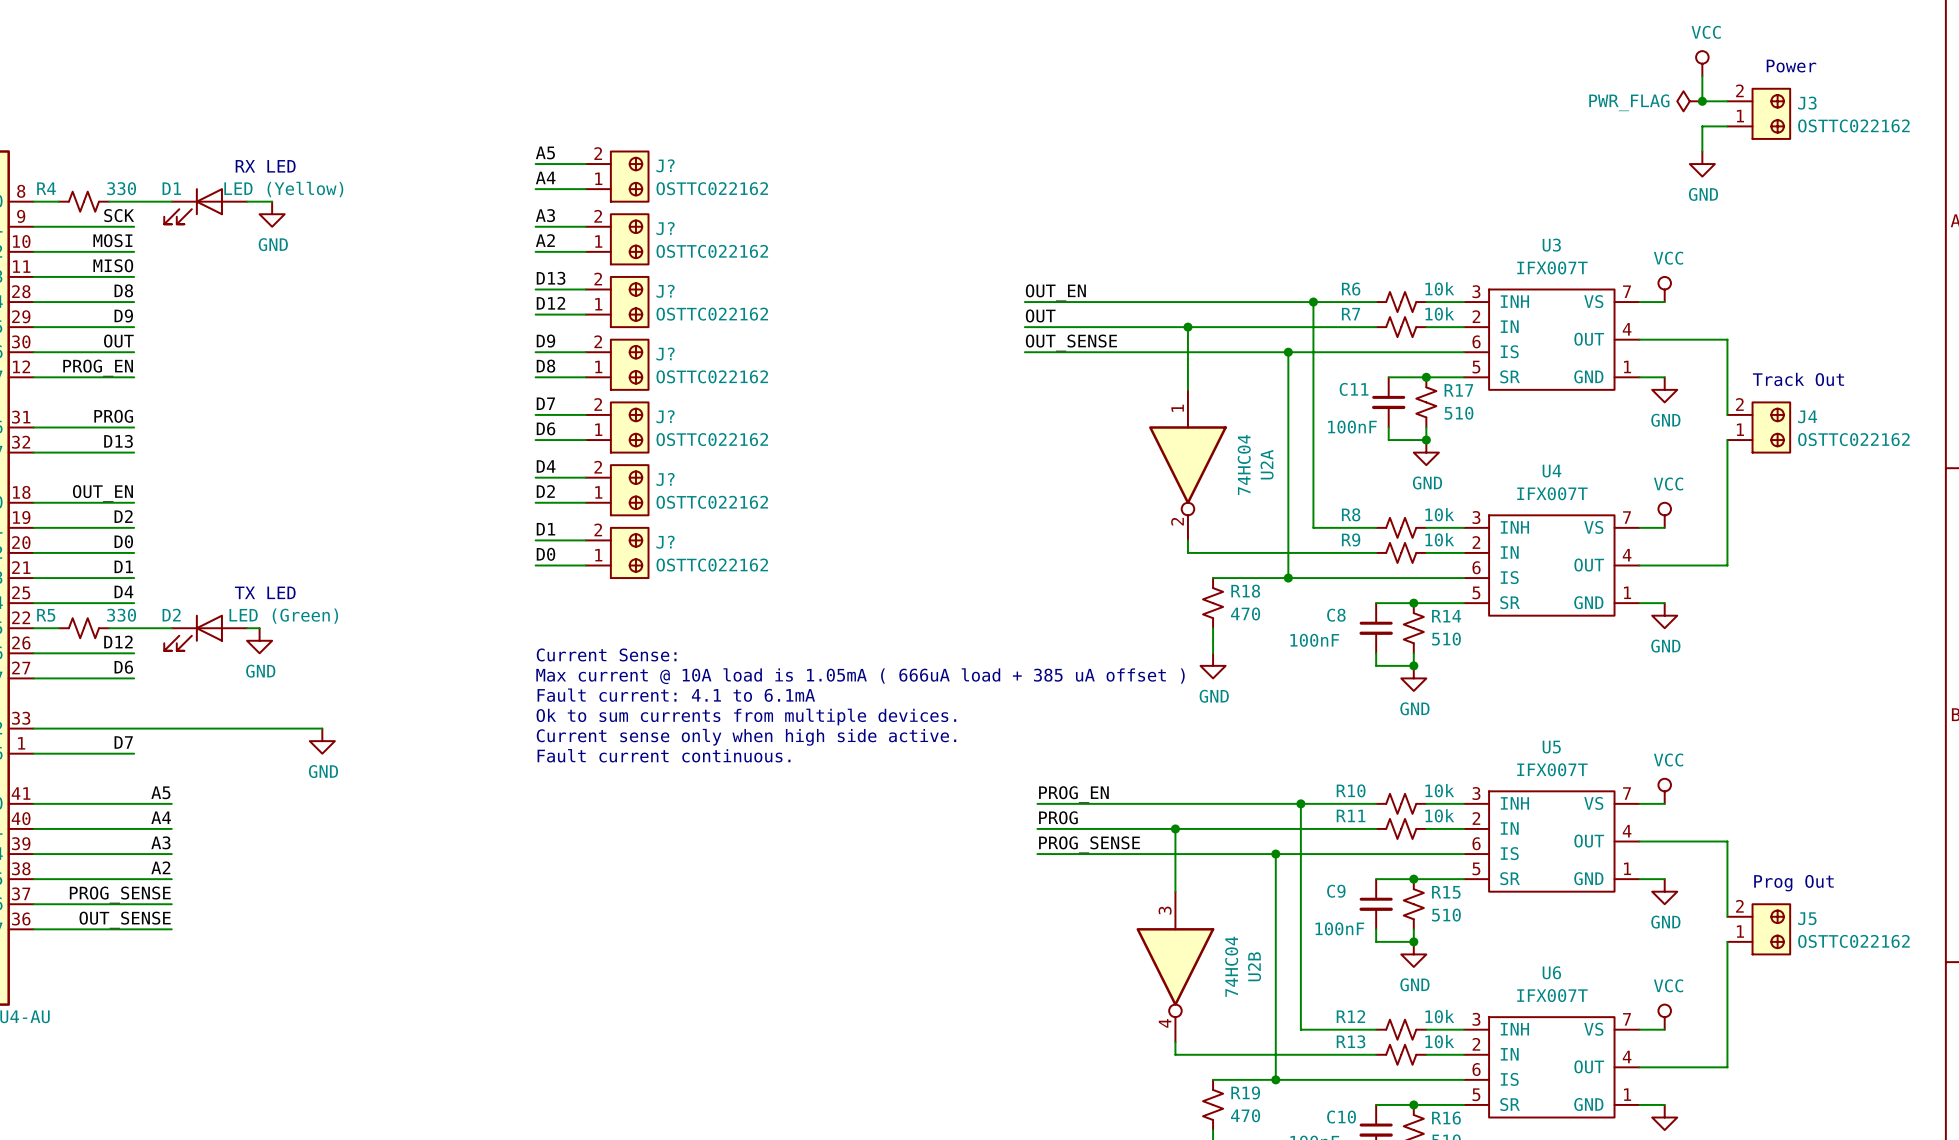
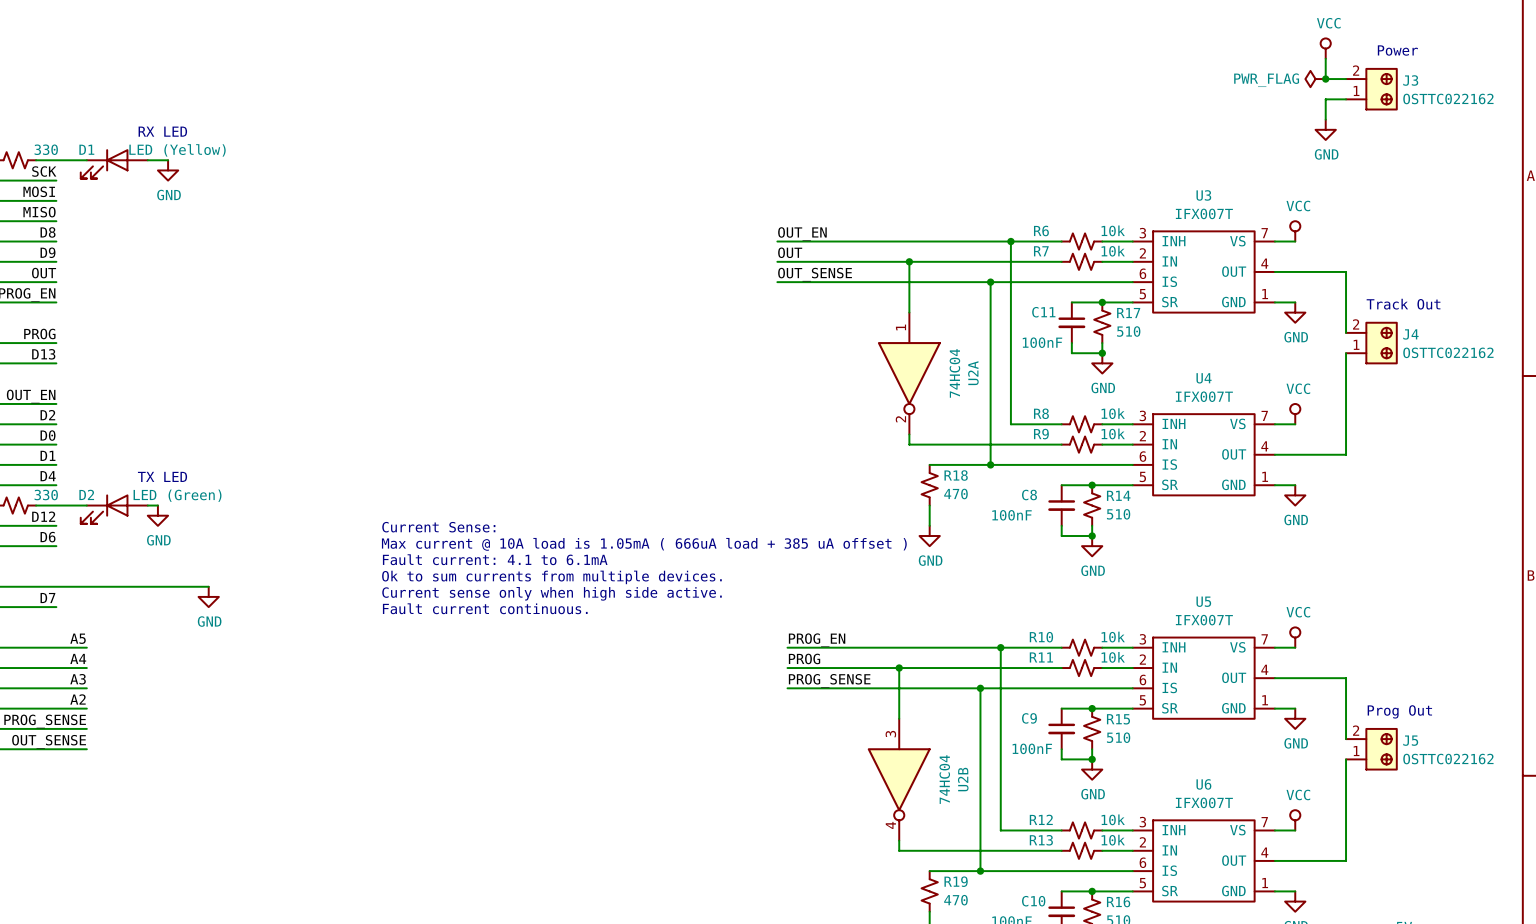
label: A5 (545, 152) -> none
wire: (535, 164) (585, 164) -> none
J?: OSTTC022162 (617, 176) -> none
label: A4 (545, 177) -> none
wire: (535, 189) (585, 189) -> none
label: A3 (545, 215) -> none
wire: (535, 226) (585, 226) -> none
J?: OSTTC022162 (617, 239) -> none
label: A2 (545, 240) -> none
wire: (535, 251) (585, 251) -> none
label: D13 (551, 278) -> none
wire: (535, 289) (585, 289) -> none
J?: OSTTC022162 (617, 302) -> none
label: D12 (550, 303) -> none
wire: (535, 314) (585, 314) -> none
label: D9 (545, 341) -> none
wire: (535, 352) (585, 352) -> none
J?: OSTTC022162 (617, 364) -> none
label: D8 (545, 366) -> none
wire: (535, 377) (585, 377) -> none
label: D7 (545, 403) -> none
wire: (535, 414) (585, 414) -> none
J?: OSTTC022162 (617, 427) -> none
label: D6 (545, 428) -> none
wire: (535, 440) (585, 440) -> none
label: D4 (546, 466) -> none
wire: (535, 477) (585, 477) -> none
J?: OSTTC022162 (617, 490) -> none
label: D2 (545, 491) -> none
wire: (535, 502) (585, 502) -> none
label: D1 (545, 529) -> none
wire: (535, 540) (585, 540) -> none
J?: OSTTC022162 (617, 552) -> none
label: D0 (545, 554) -> none
wire: (535, 565) (585, 565) -> none

